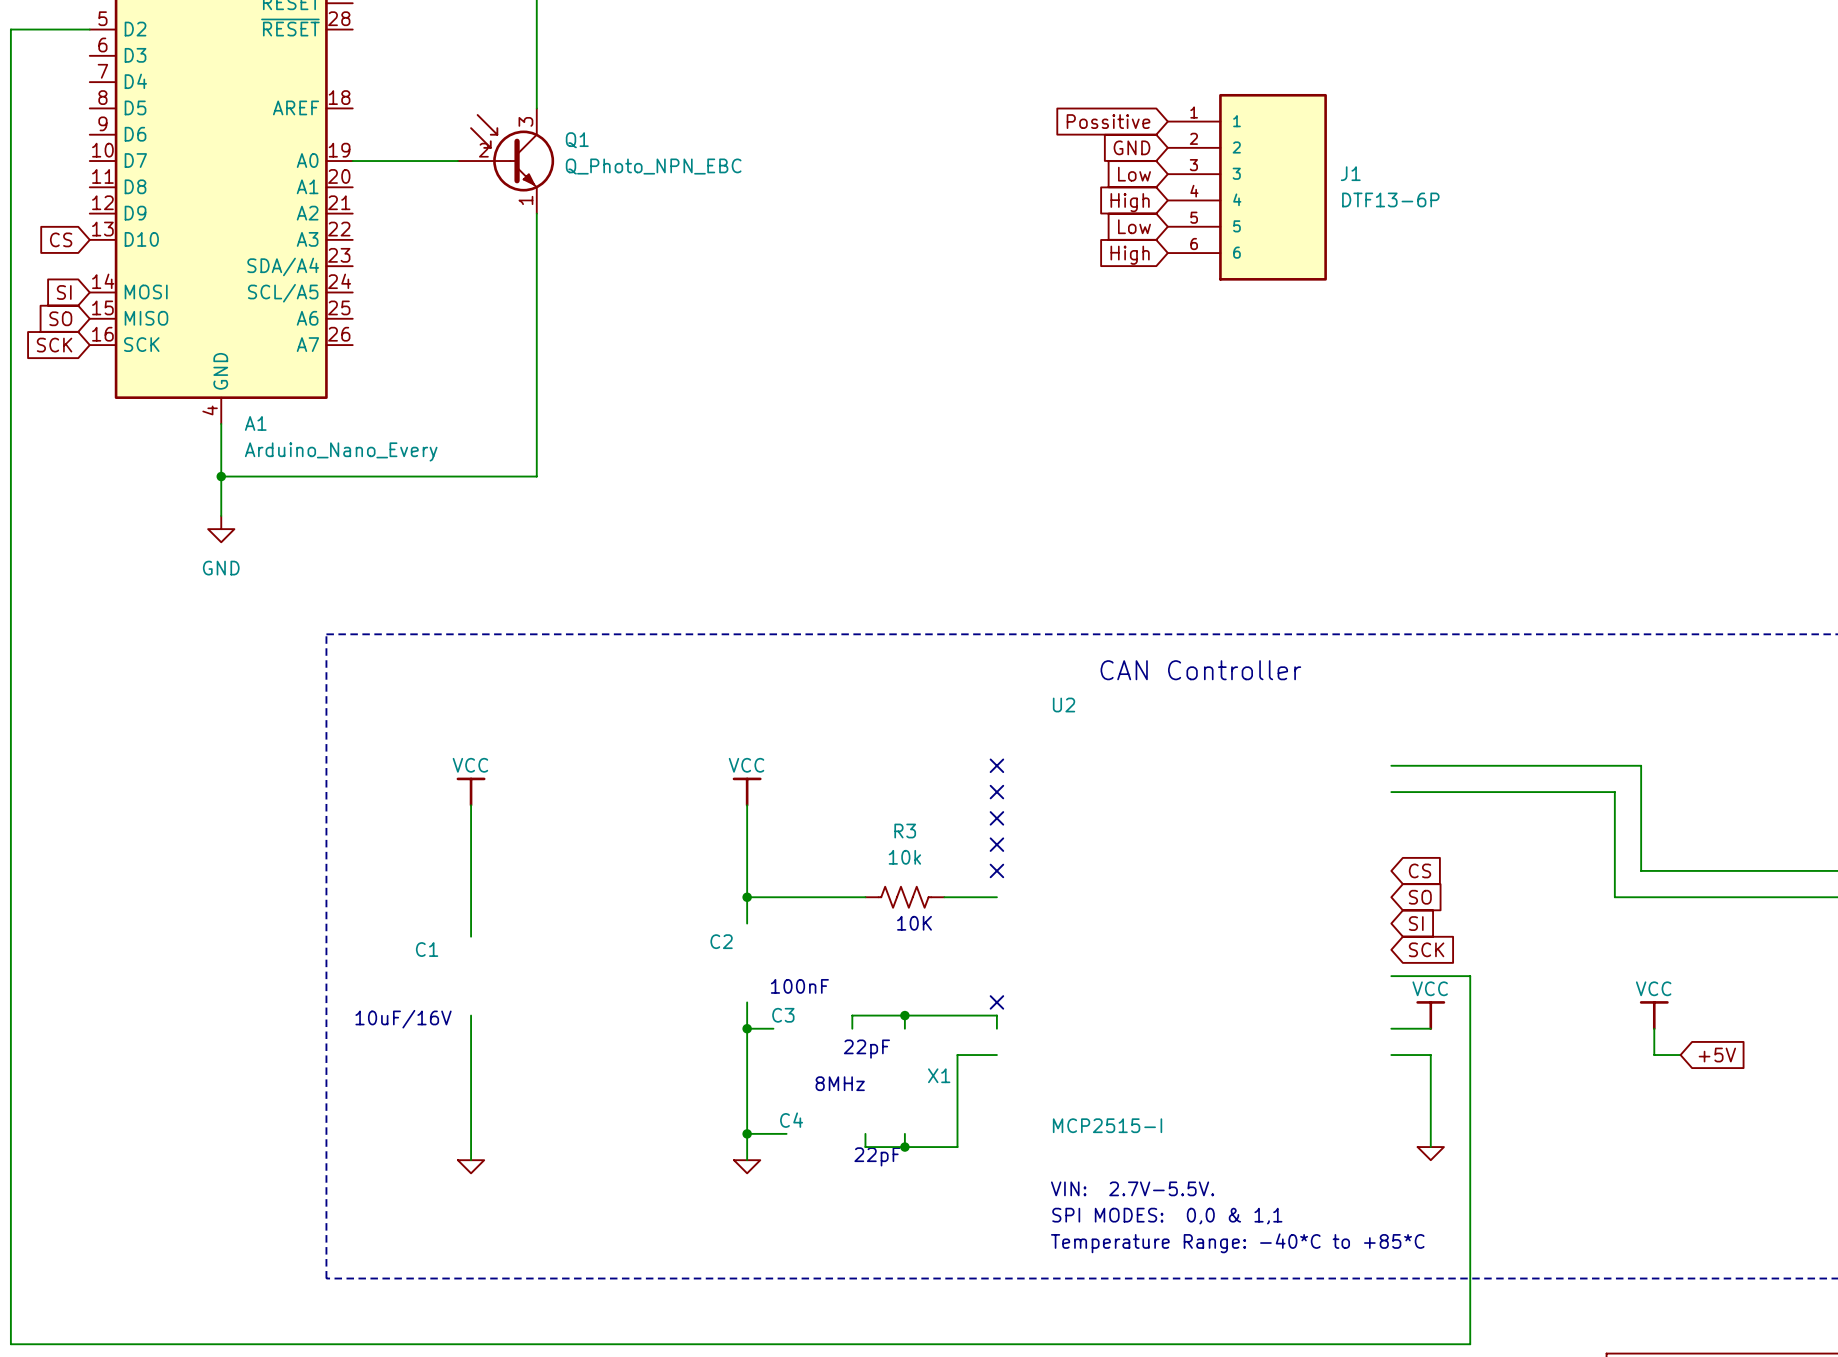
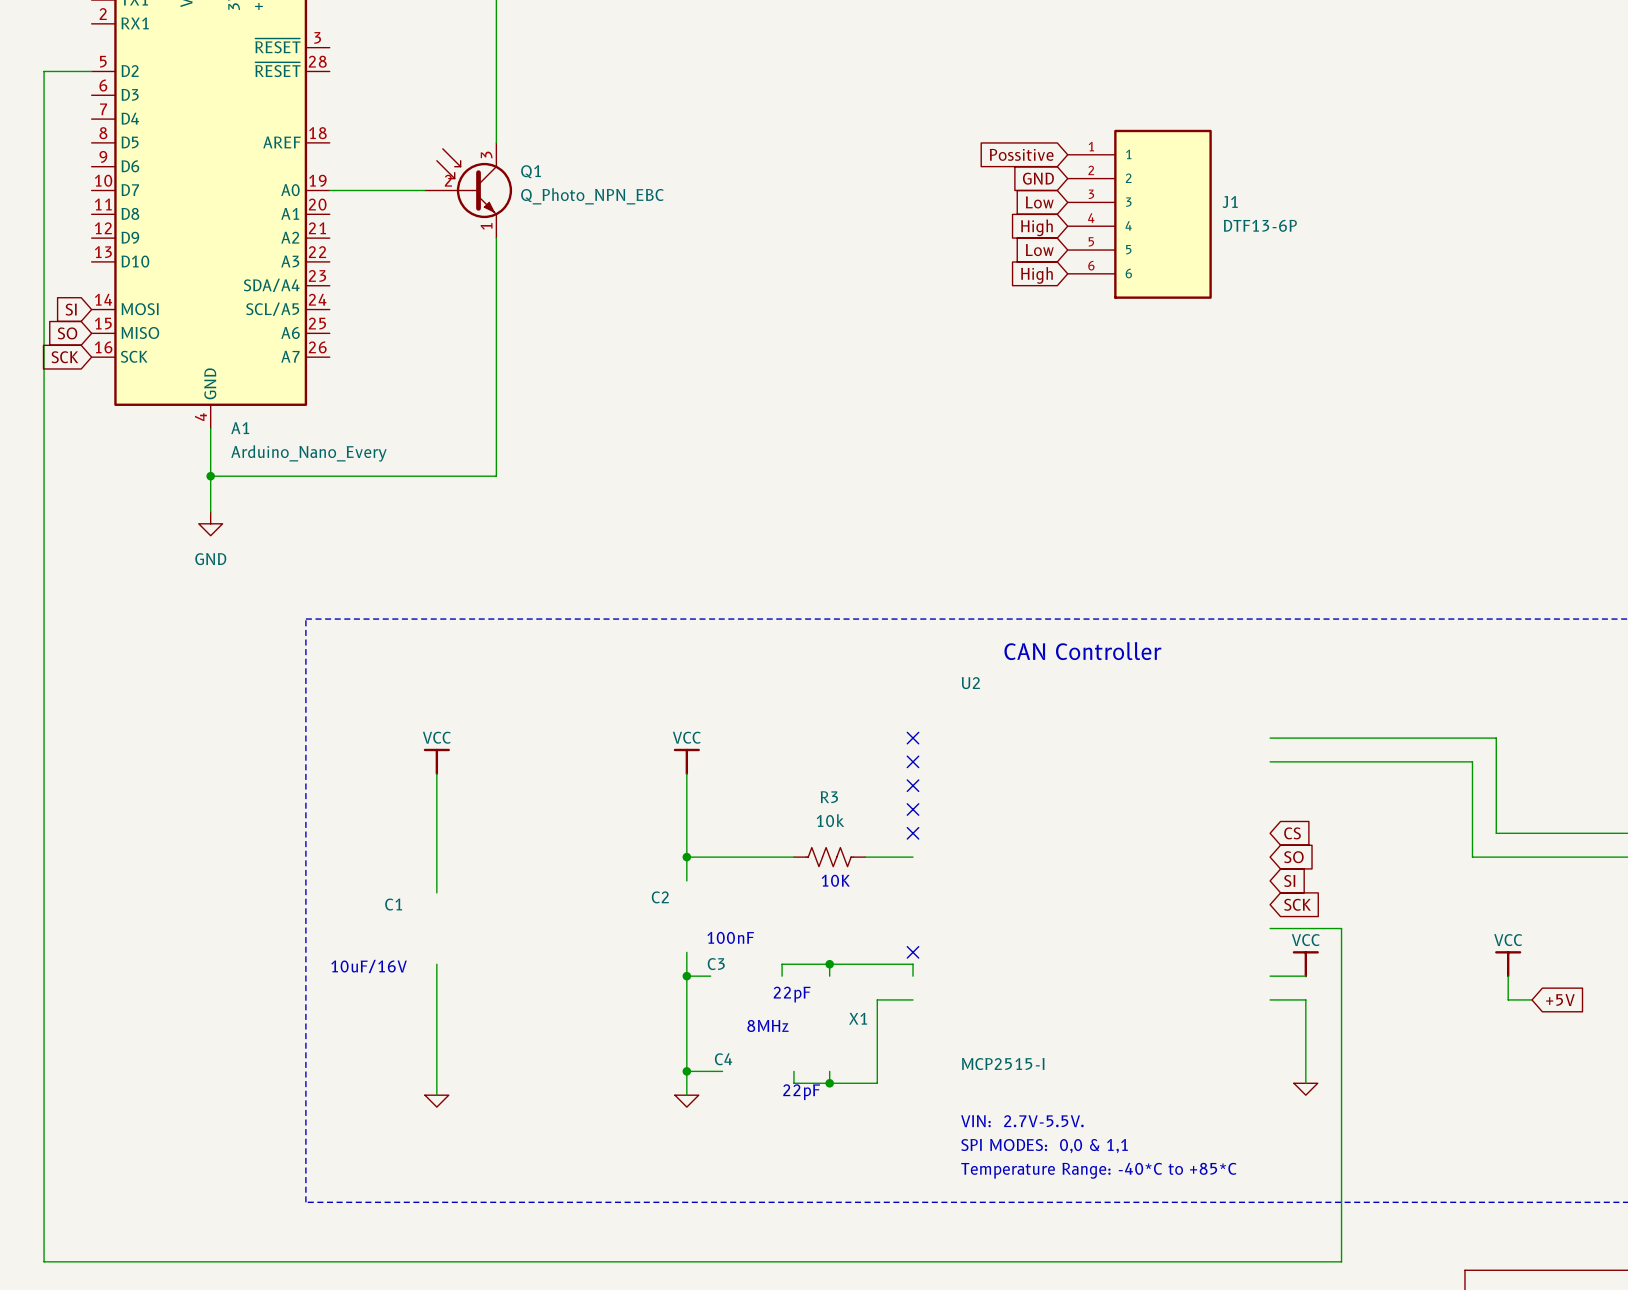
wire: (37, 29) (10, 29) (10, 1344) (37, 1344) -> (44, 71) (44, 1261)
global label: CS (61, 239) -> none

